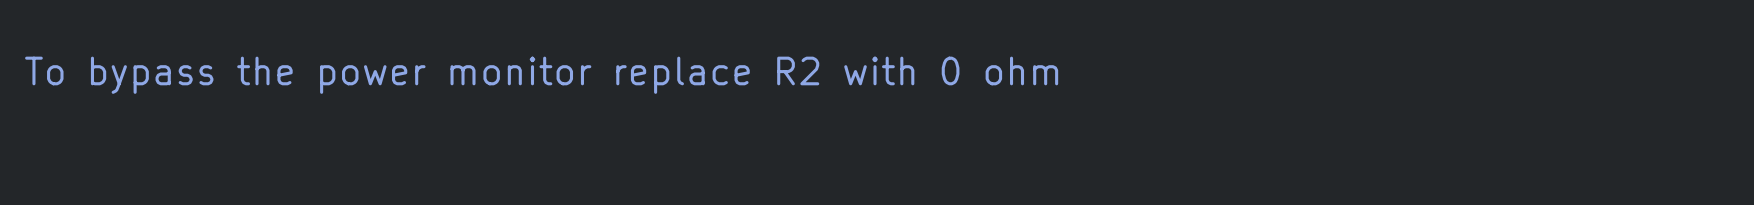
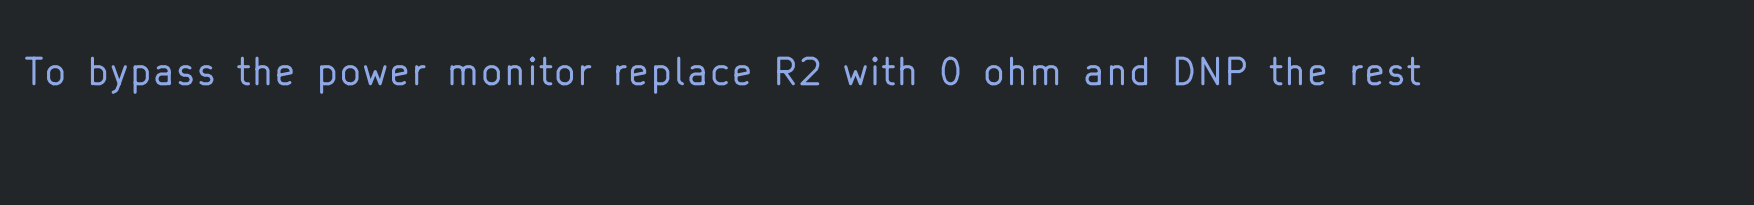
text: To bypass the power monitor replace R2 with 0 ohm (541, 75) -> To bypass the power monitor replace R2 with 0 ohm and DNP the rest (722, 75)

